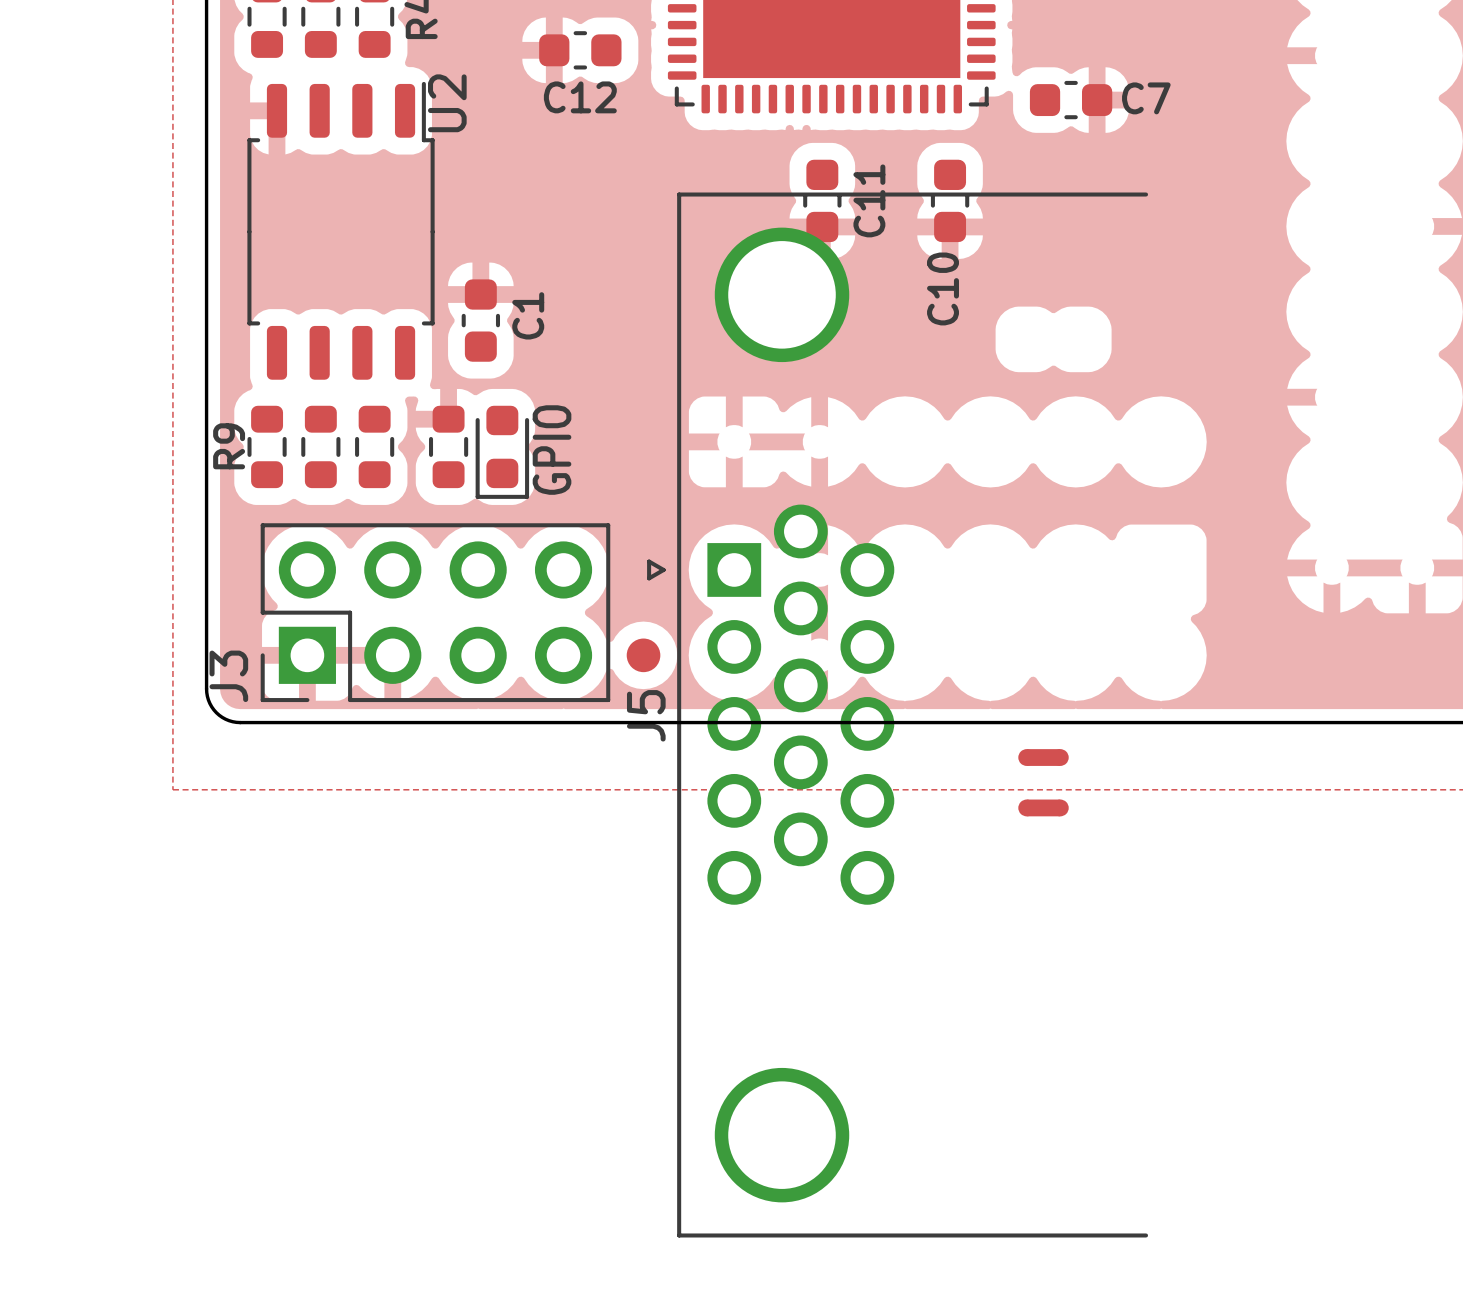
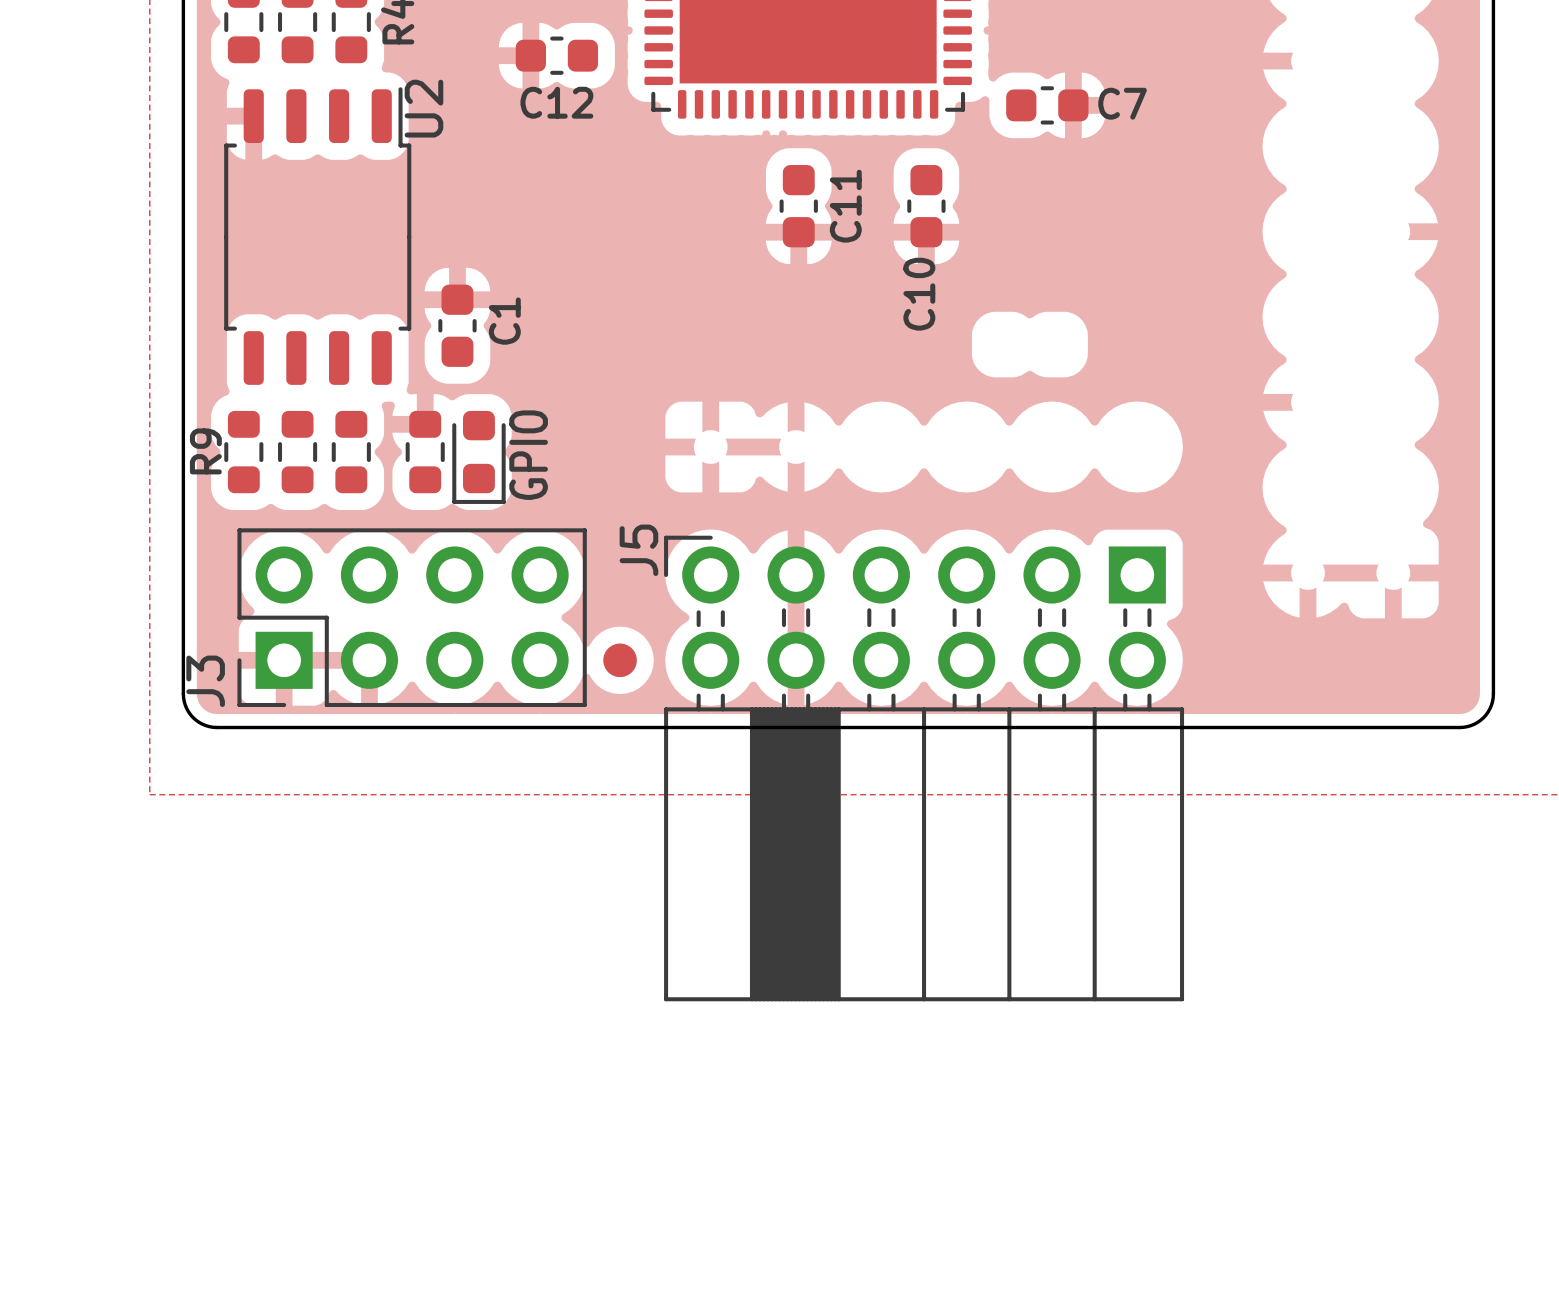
J5 footprint: [647, 192, 1149, 1238] -> [664, 535, 1185, 1002]
J5 name position: J5 (646, 715) -> J5 (638, 550)
part: (1043, 757) -> none
part: (1043, 807) -> none

